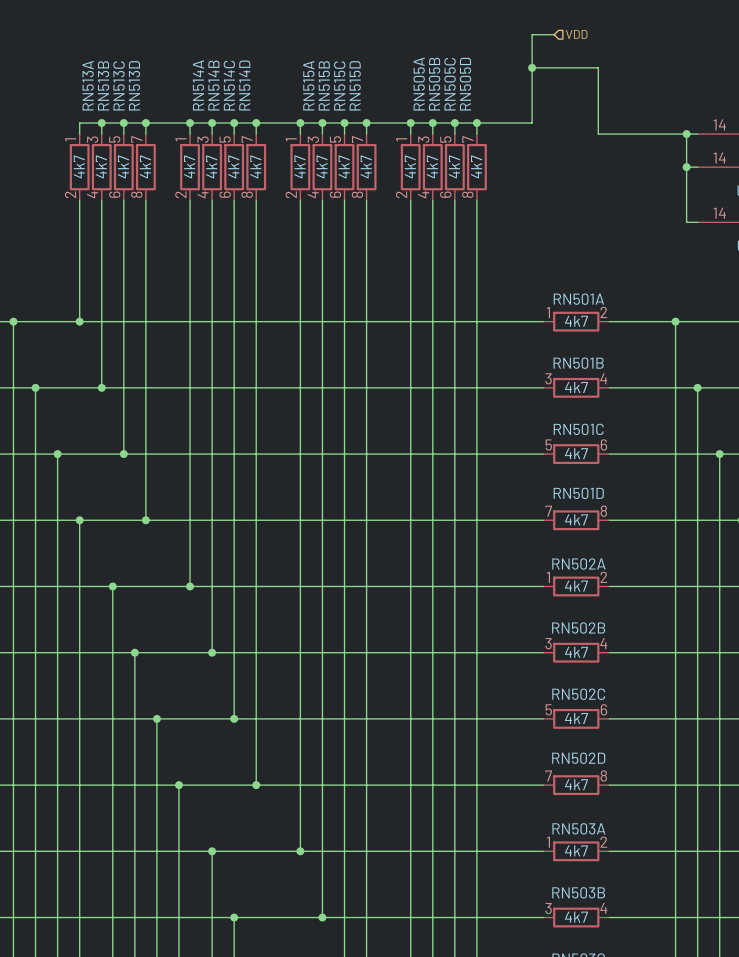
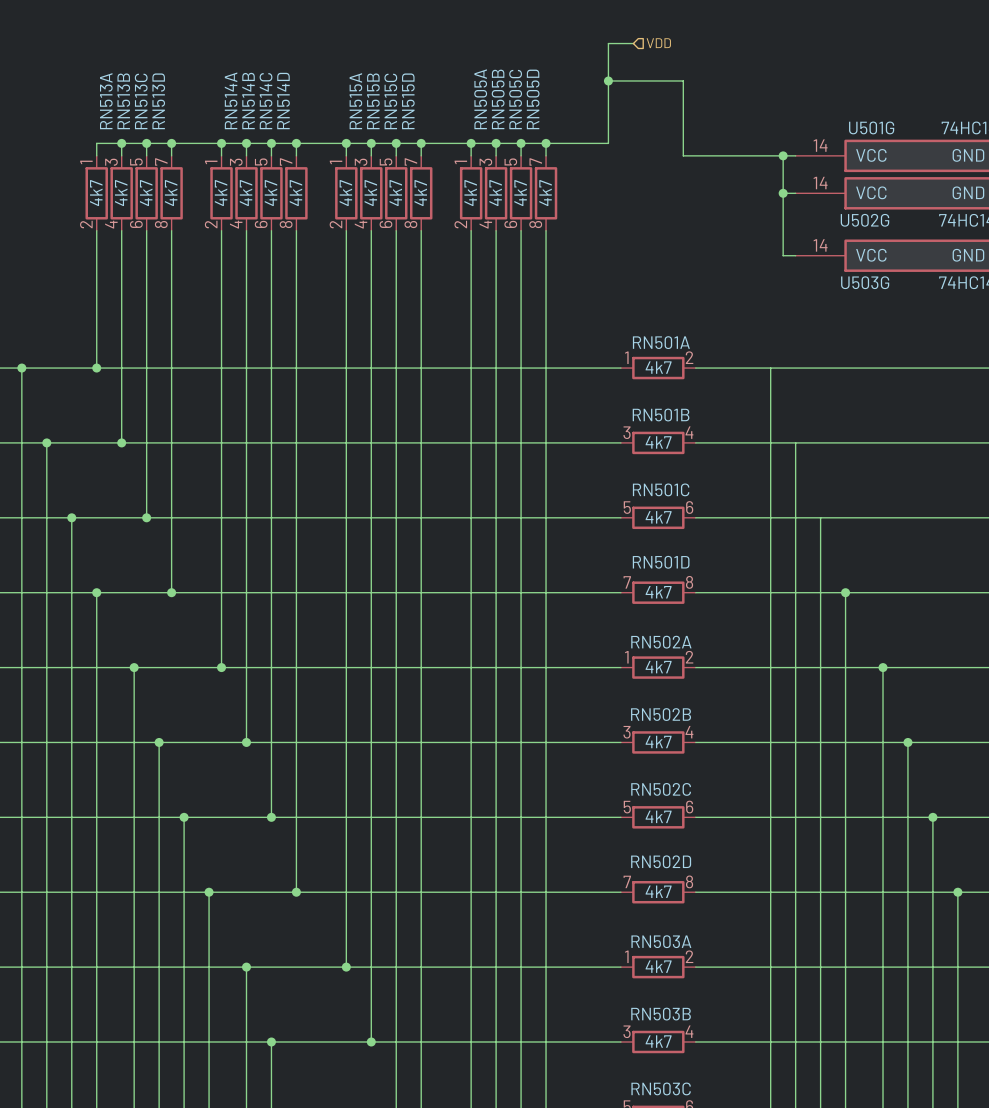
junction: (675, 321) -> none
junction: (697, 387) -> none
junction: (719, 454) -> none

